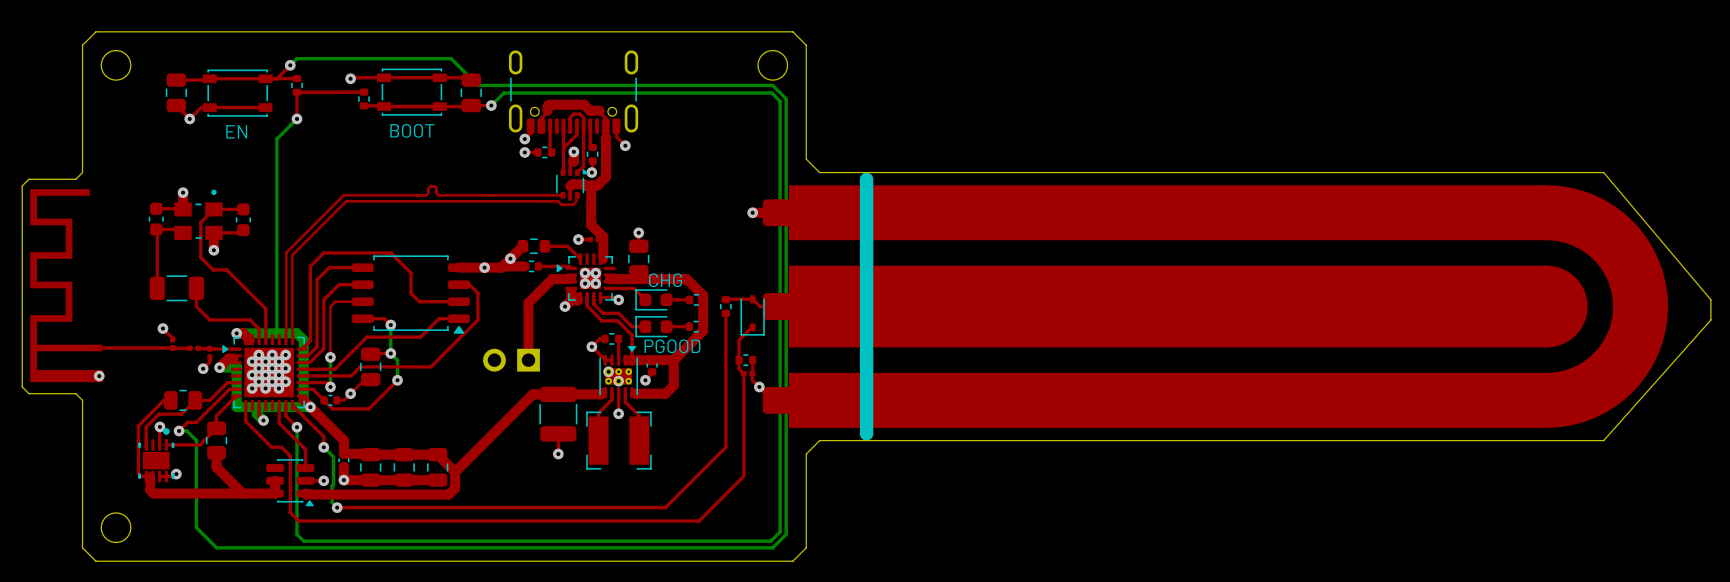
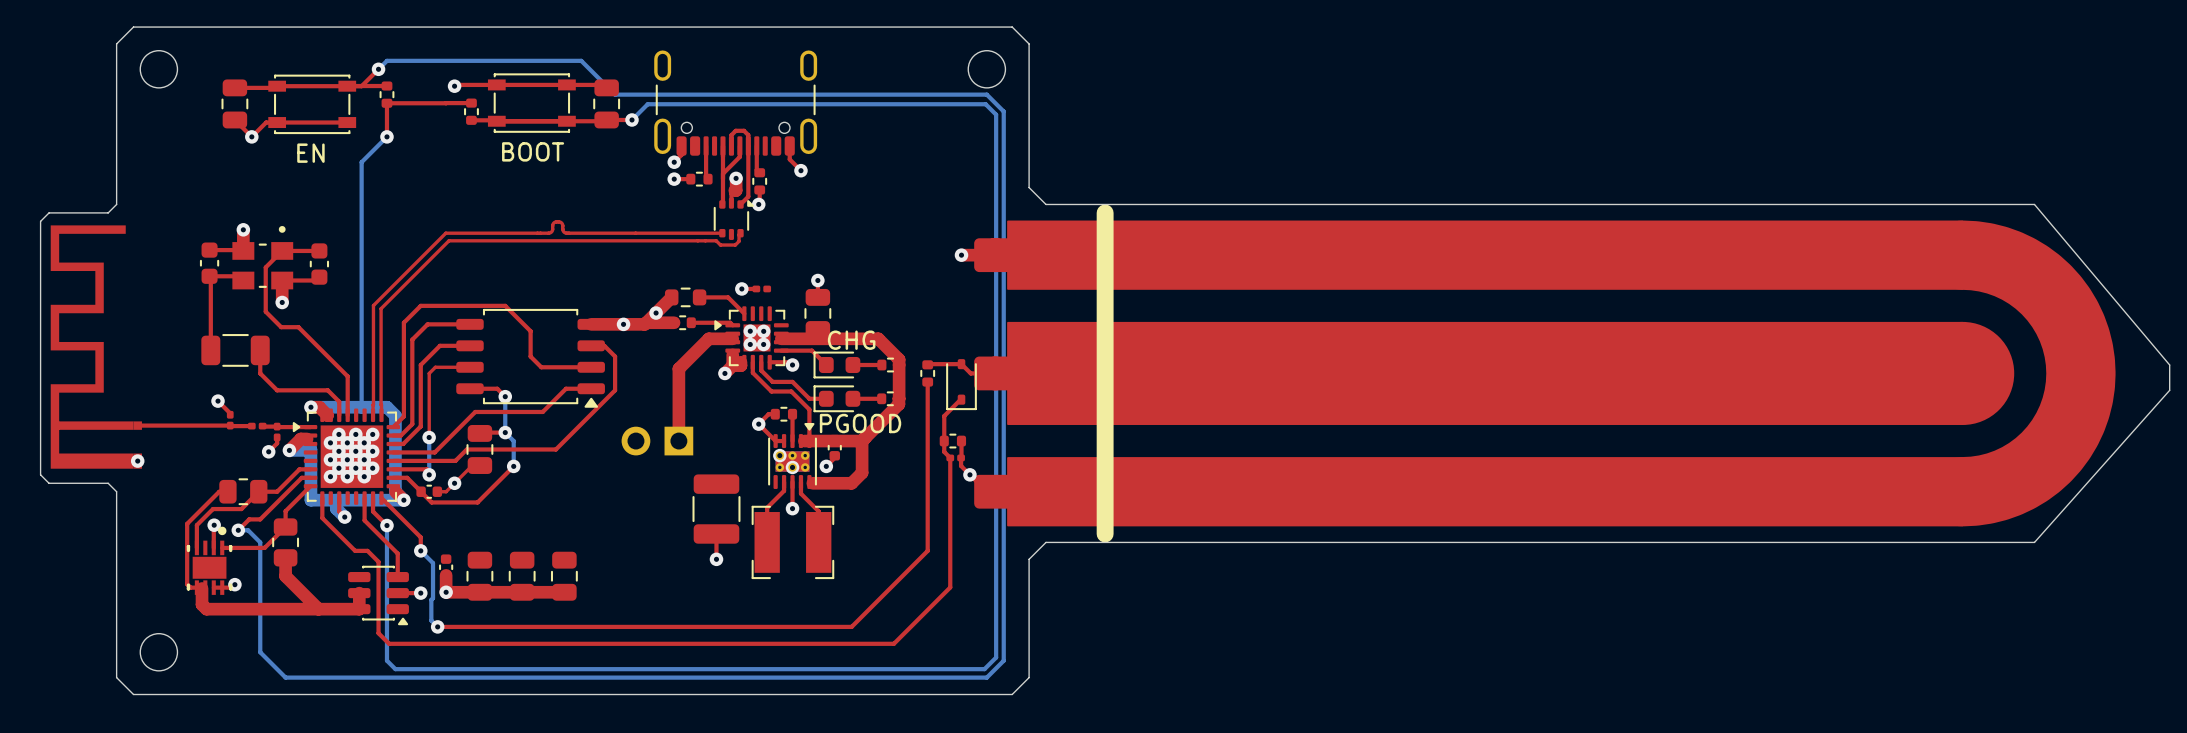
top track: (541, 126) (541, 118) (547, 112) (549, 104) (584, 104) (590, 110) (599, 110) (605, 118) (605, 126) -> none
top track: (605, 137) (605, 176) (597, 185) (572, 184) (570, 186) (570, 196) -> none
top track: (591, 185) (591, 224) (603, 236) (603, 259) -> none
top track: (602, 392) (600, 394) (532, 394) (455, 472) -> none
top track: (310, 407) (343, 440) (343, 453) (369, 453) -> none
top track: (370, 454) (437, 454) (455, 472) -> none
top track: (455, 472) (455, 488) (448, 494) (305, 493) -> none

